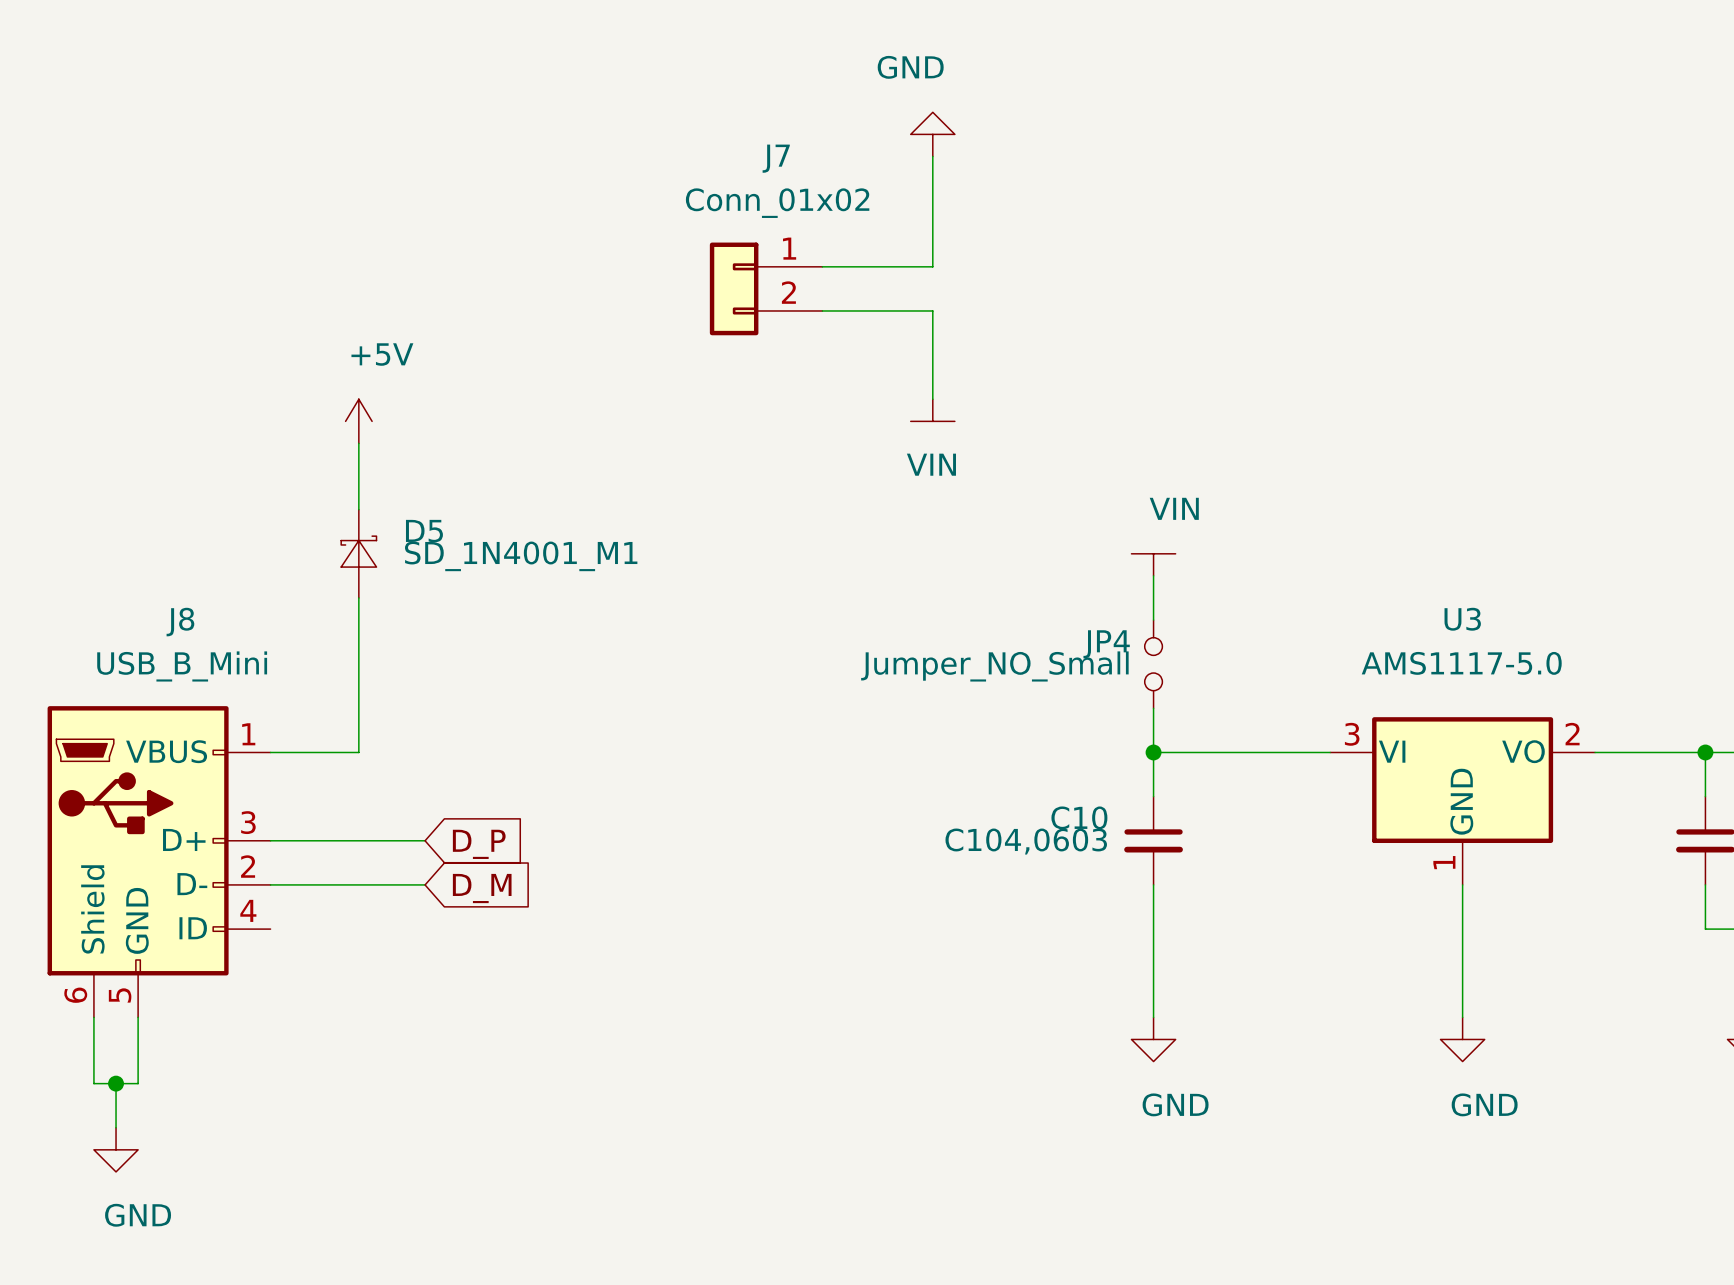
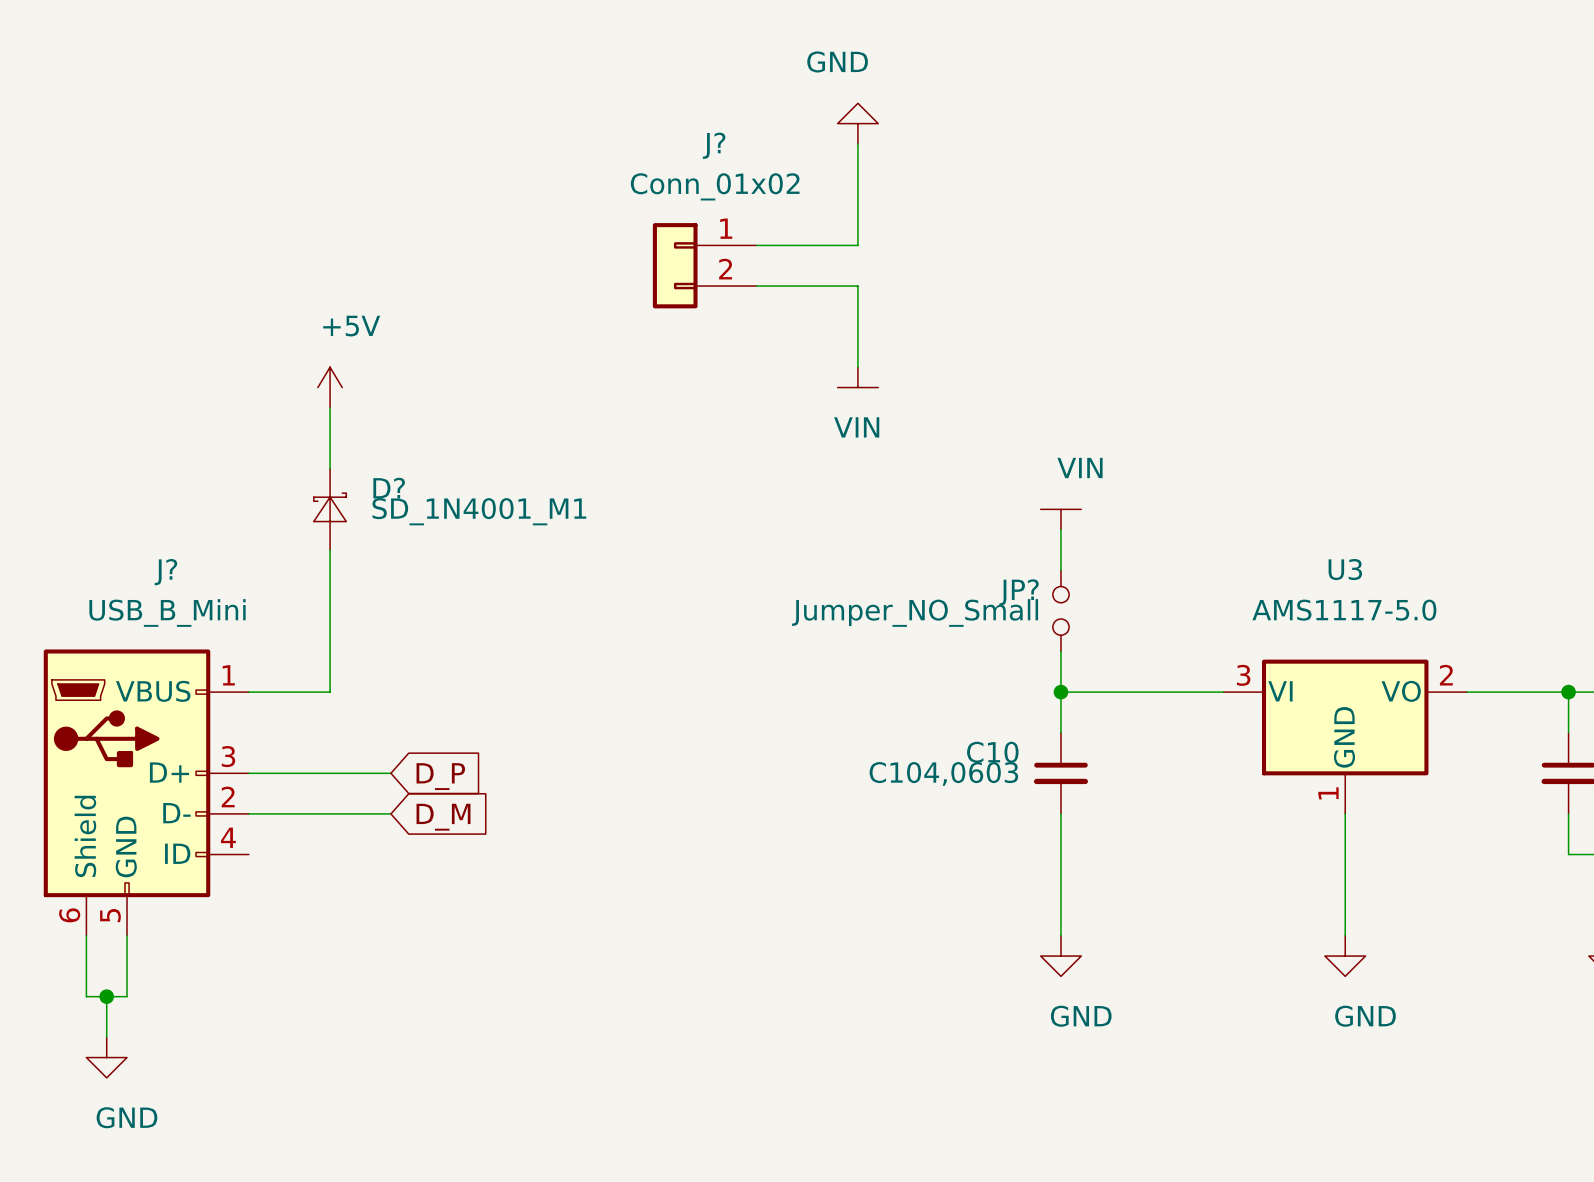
J7 name: J7 (776, 158) -> J? (714, 145)
D5 name: D5 (424, 531) -> D? (389, 488)
J8 name: J8 (180, 622) -> J? (165, 572)
JP4 name: JP4 (1106, 644) -> JP? (1019, 592)

